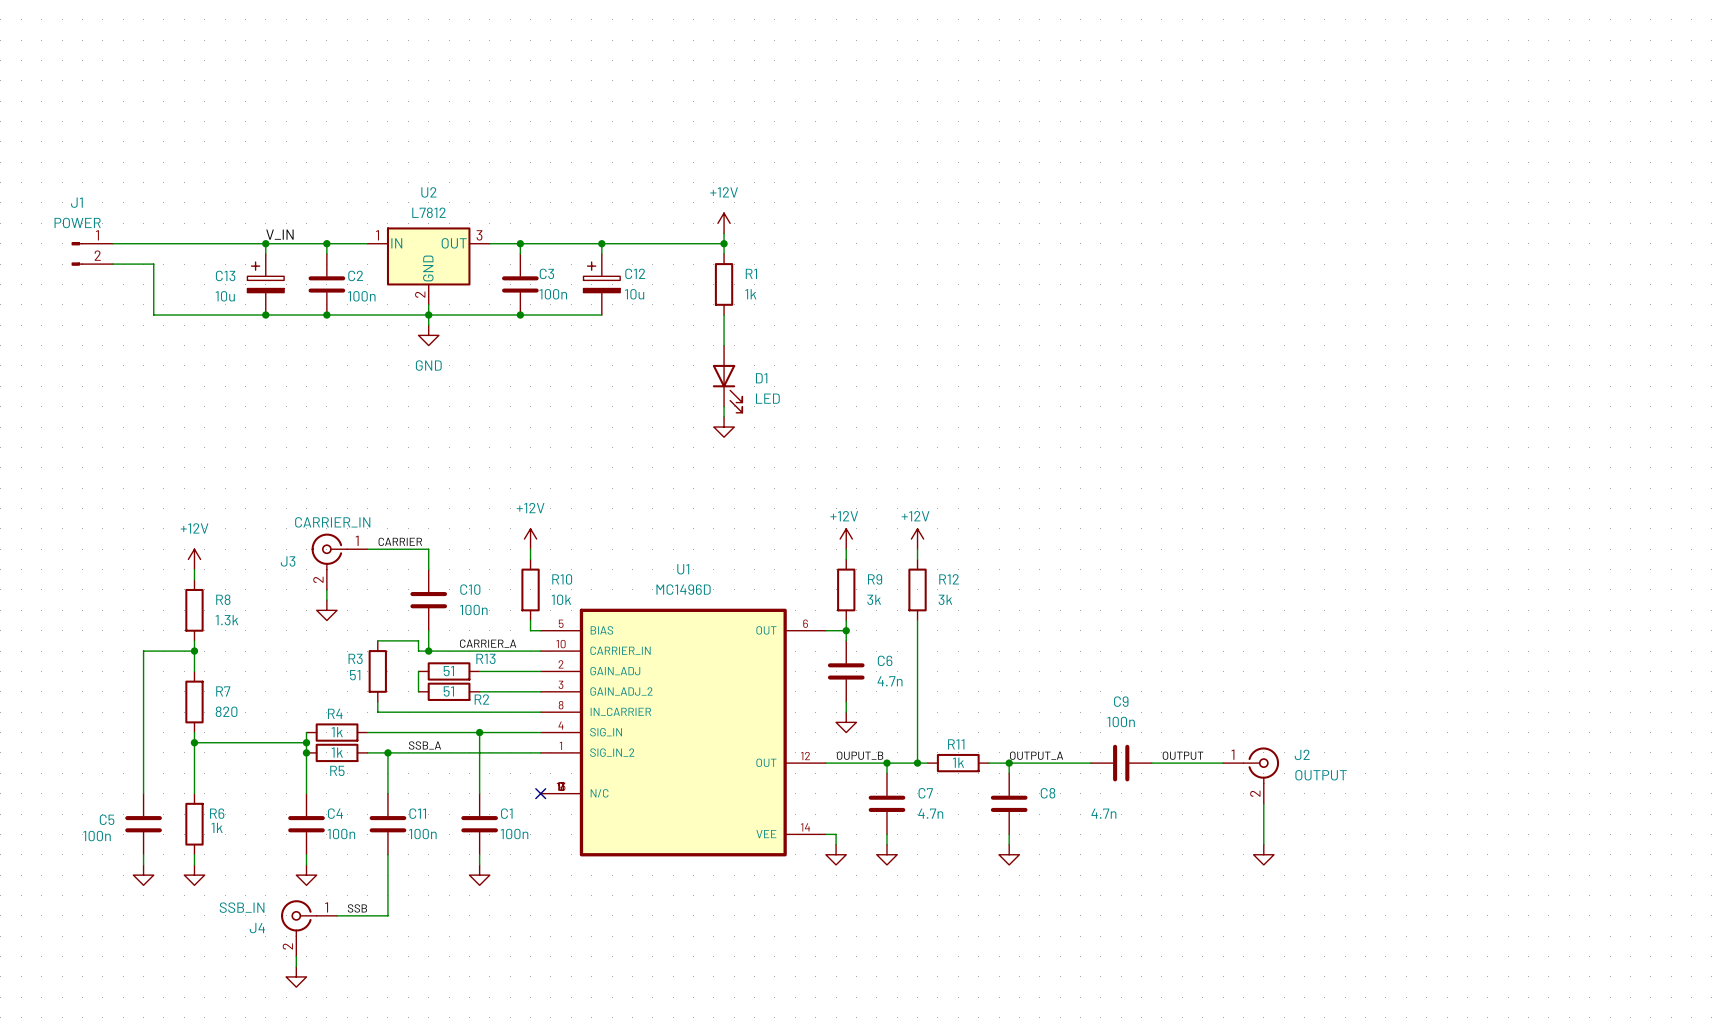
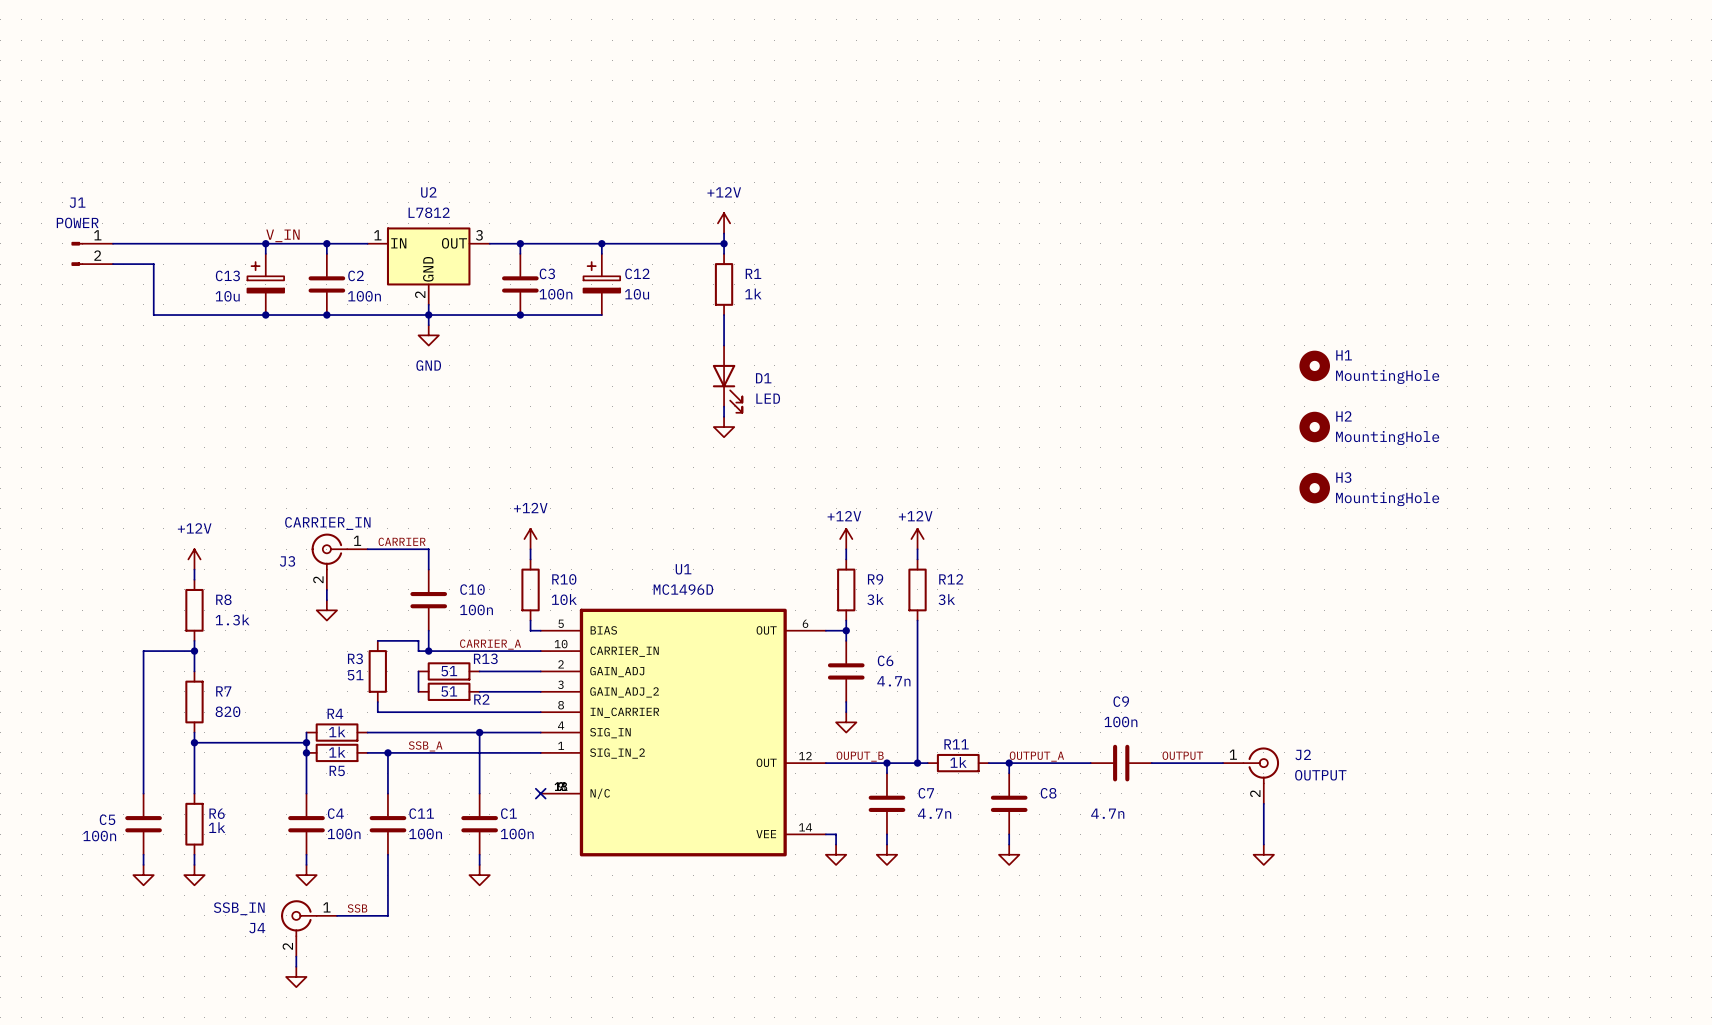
H1: none -> MountingHole (1314, 365)
H2: none -> MountingHole (1314, 427)
H3: none -> MountingHole (1314, 488)

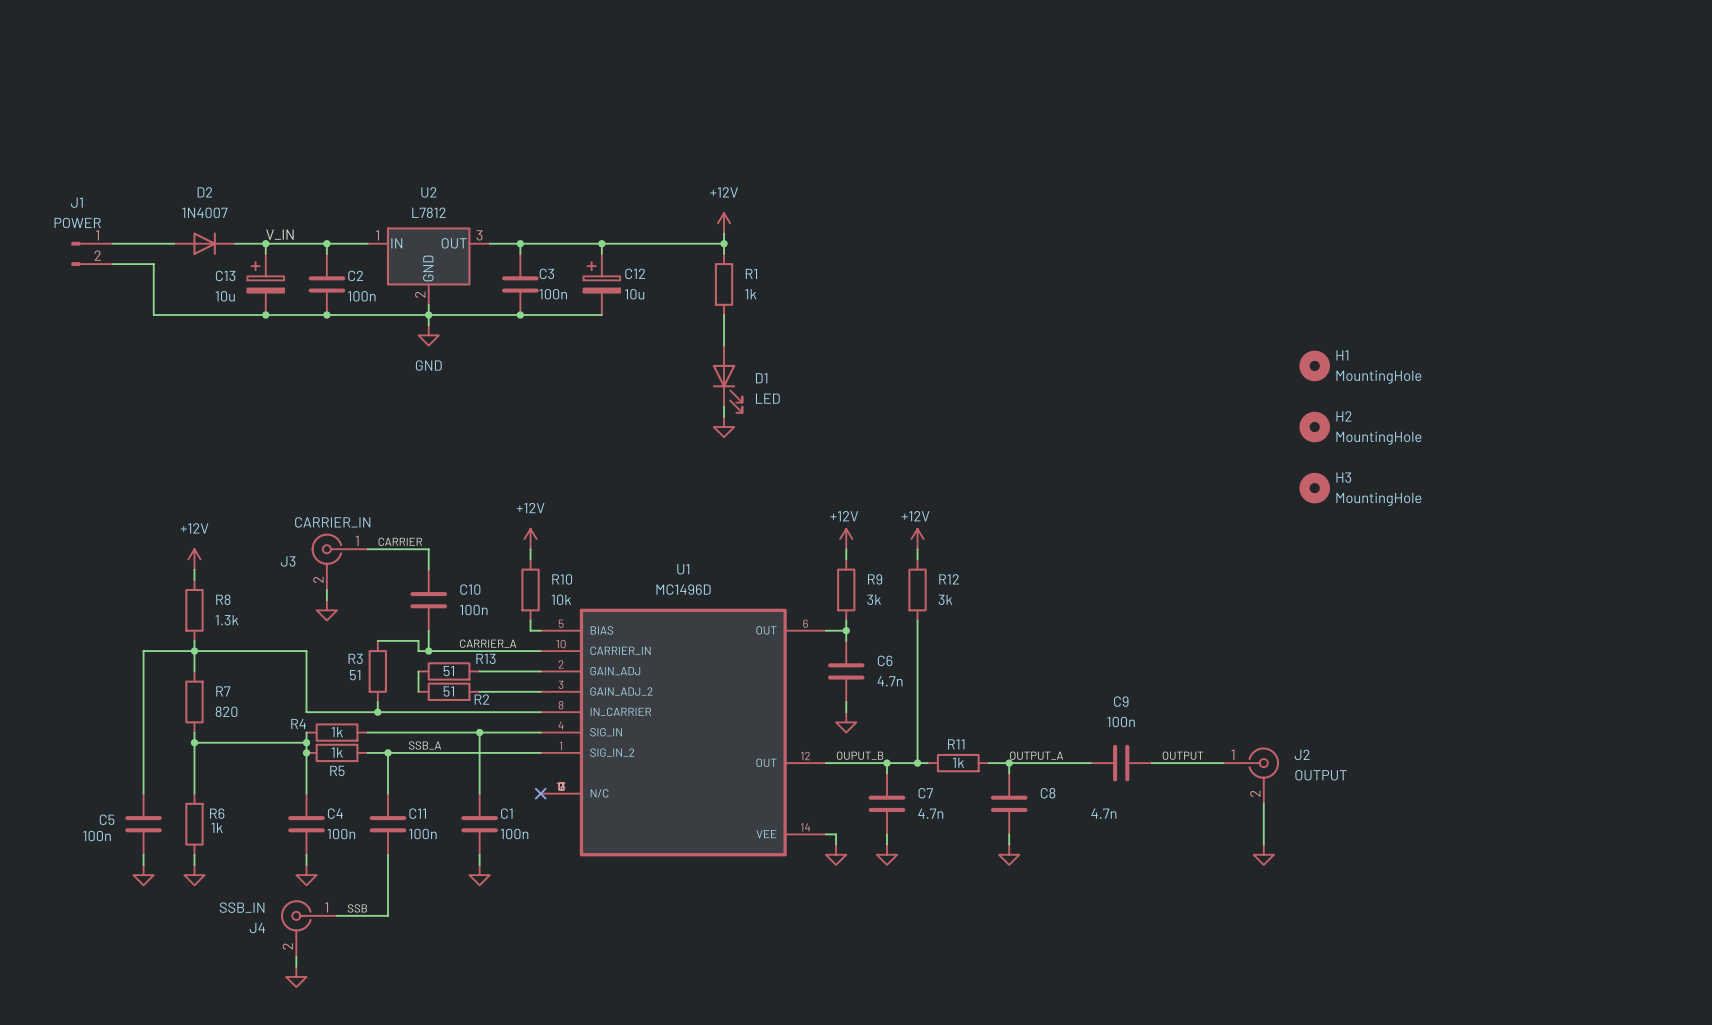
D2: none -> 1N4007 (204, 243)
wire: none -> (194, 651) (306, 651) (306, 712) (377, 712)
junction: none -> (377, 712)
R4 name position: R4 (335, 713) -> R4 (298, 724)

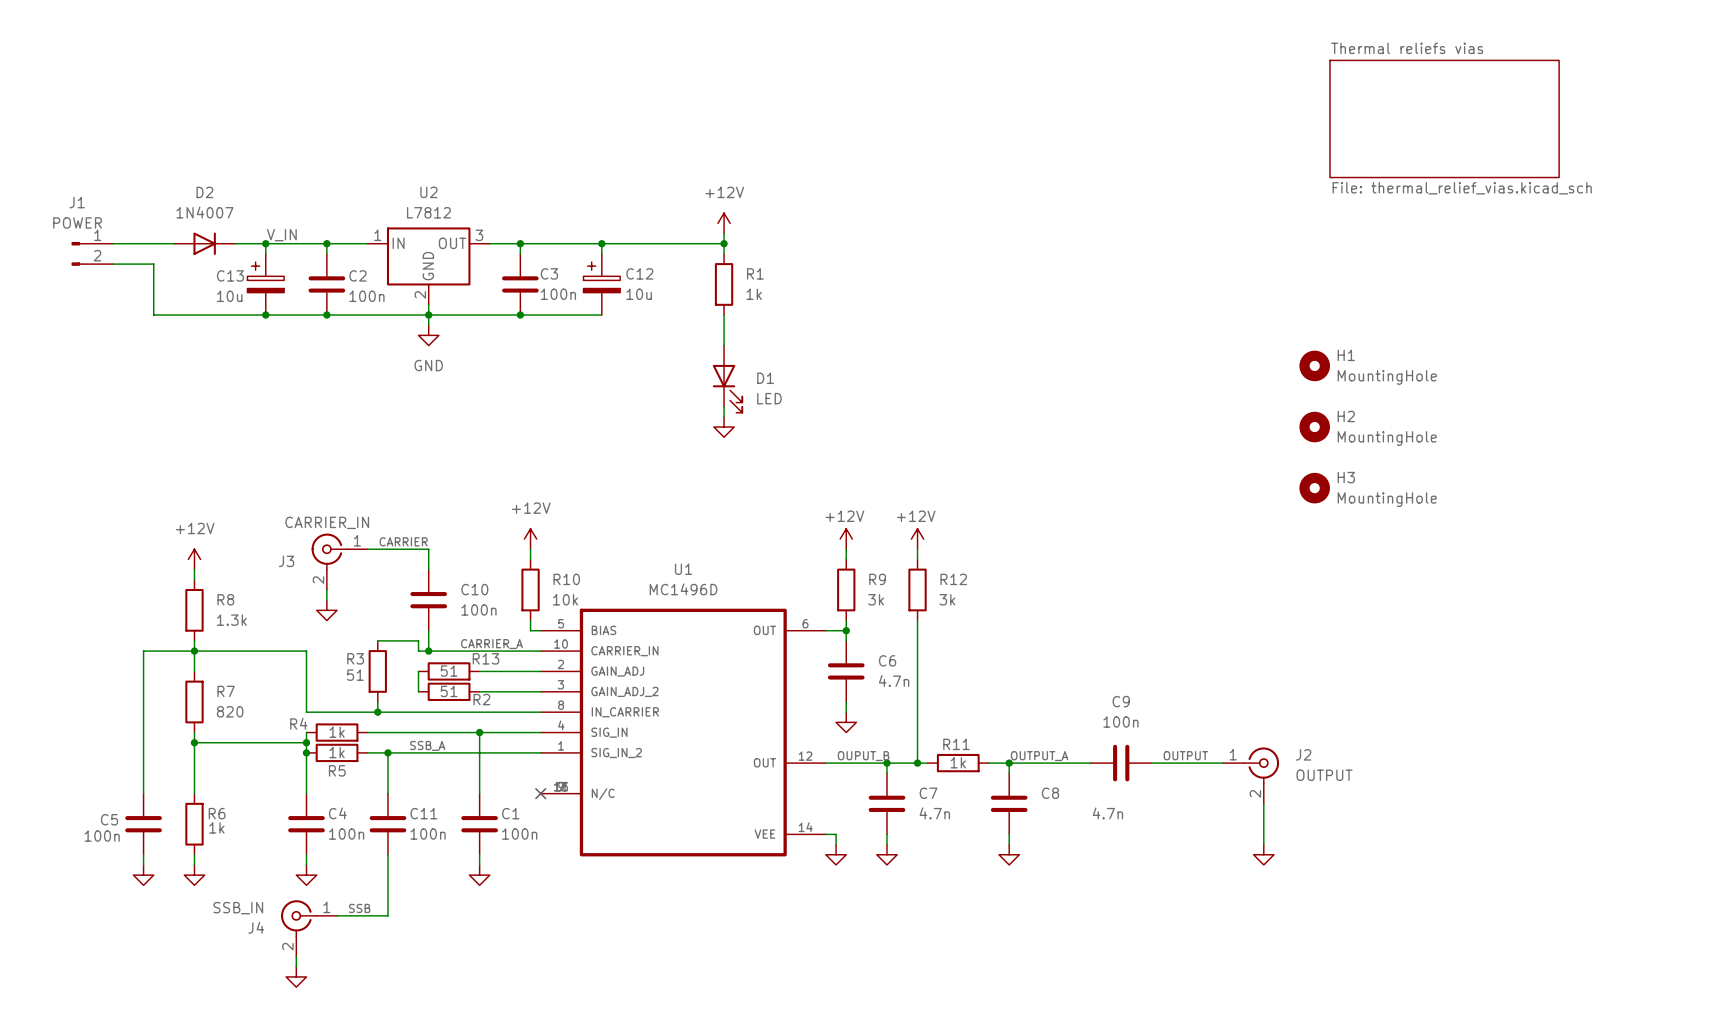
sheet Thermal reliefs vias: none -> File: thermal_relief_vias.kicad_sch (1444, 118)

